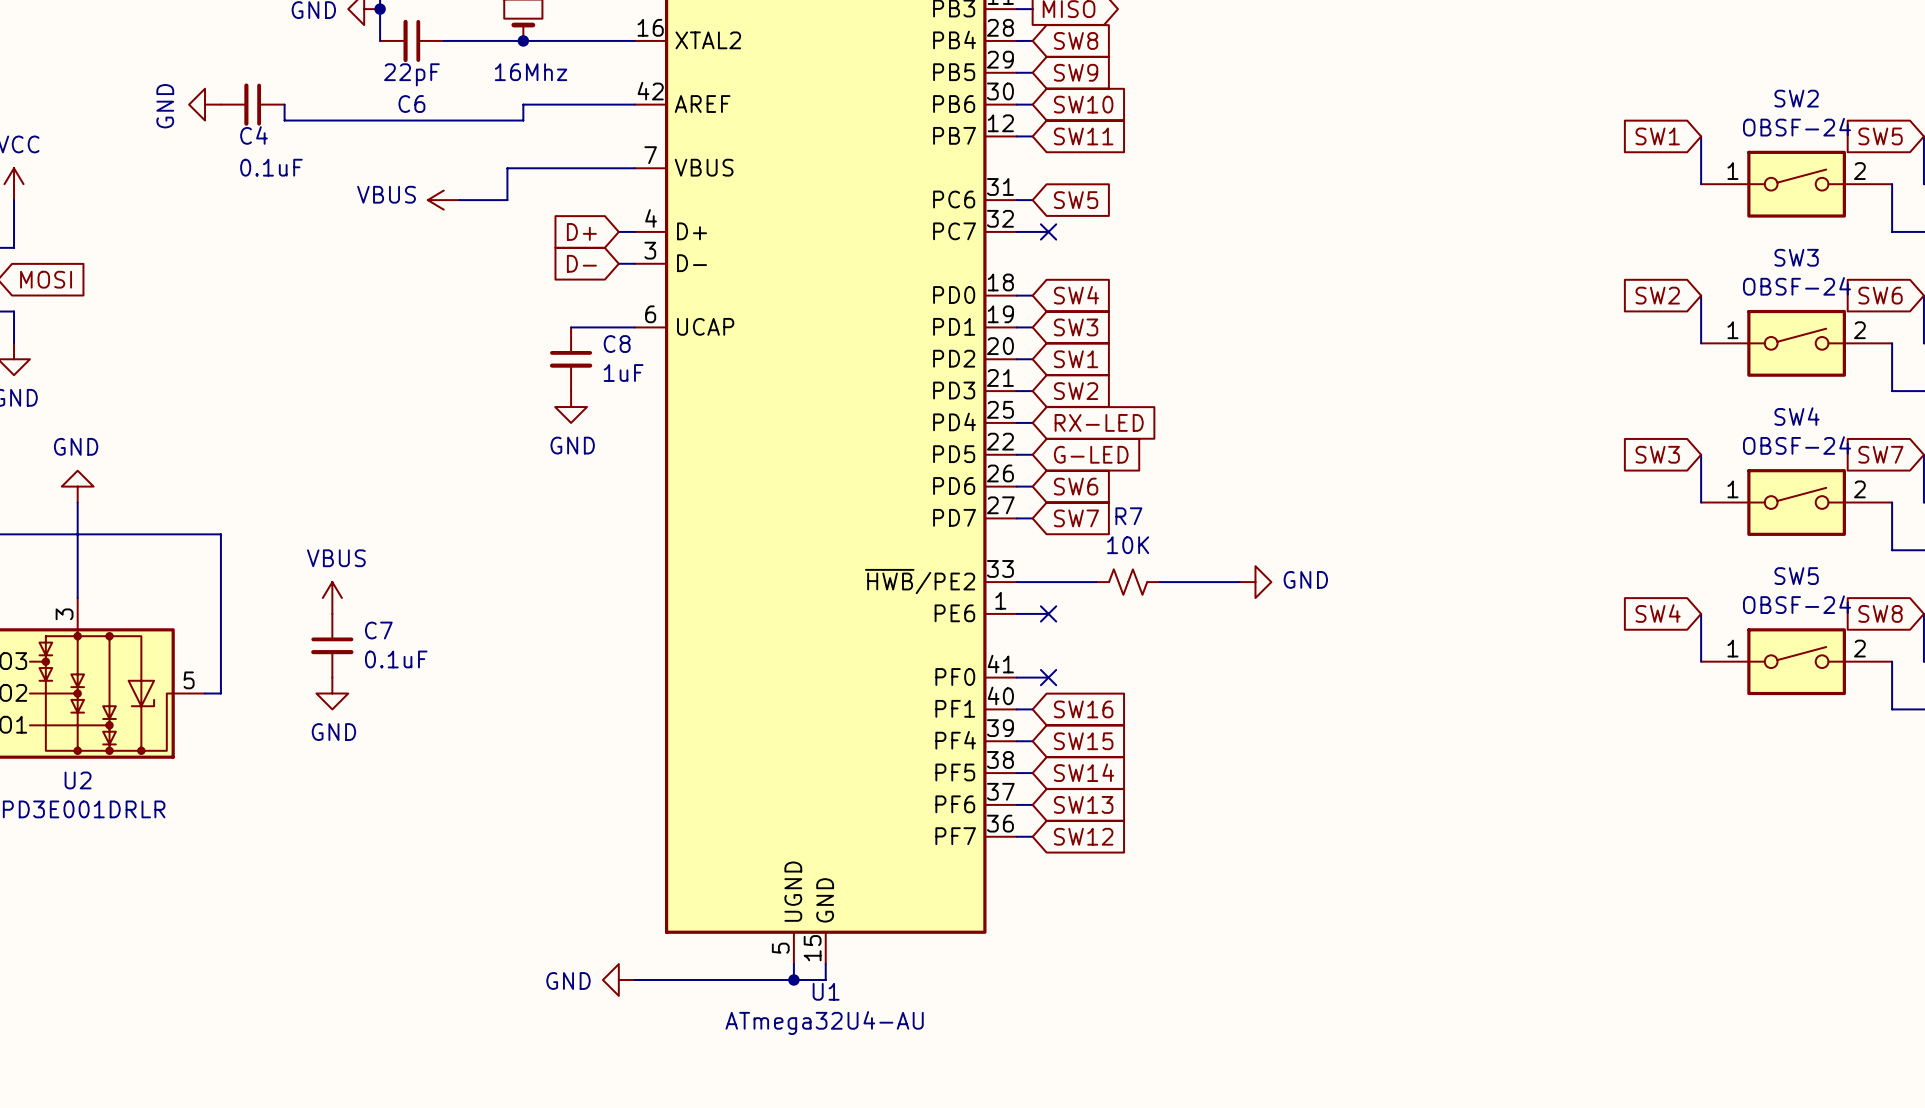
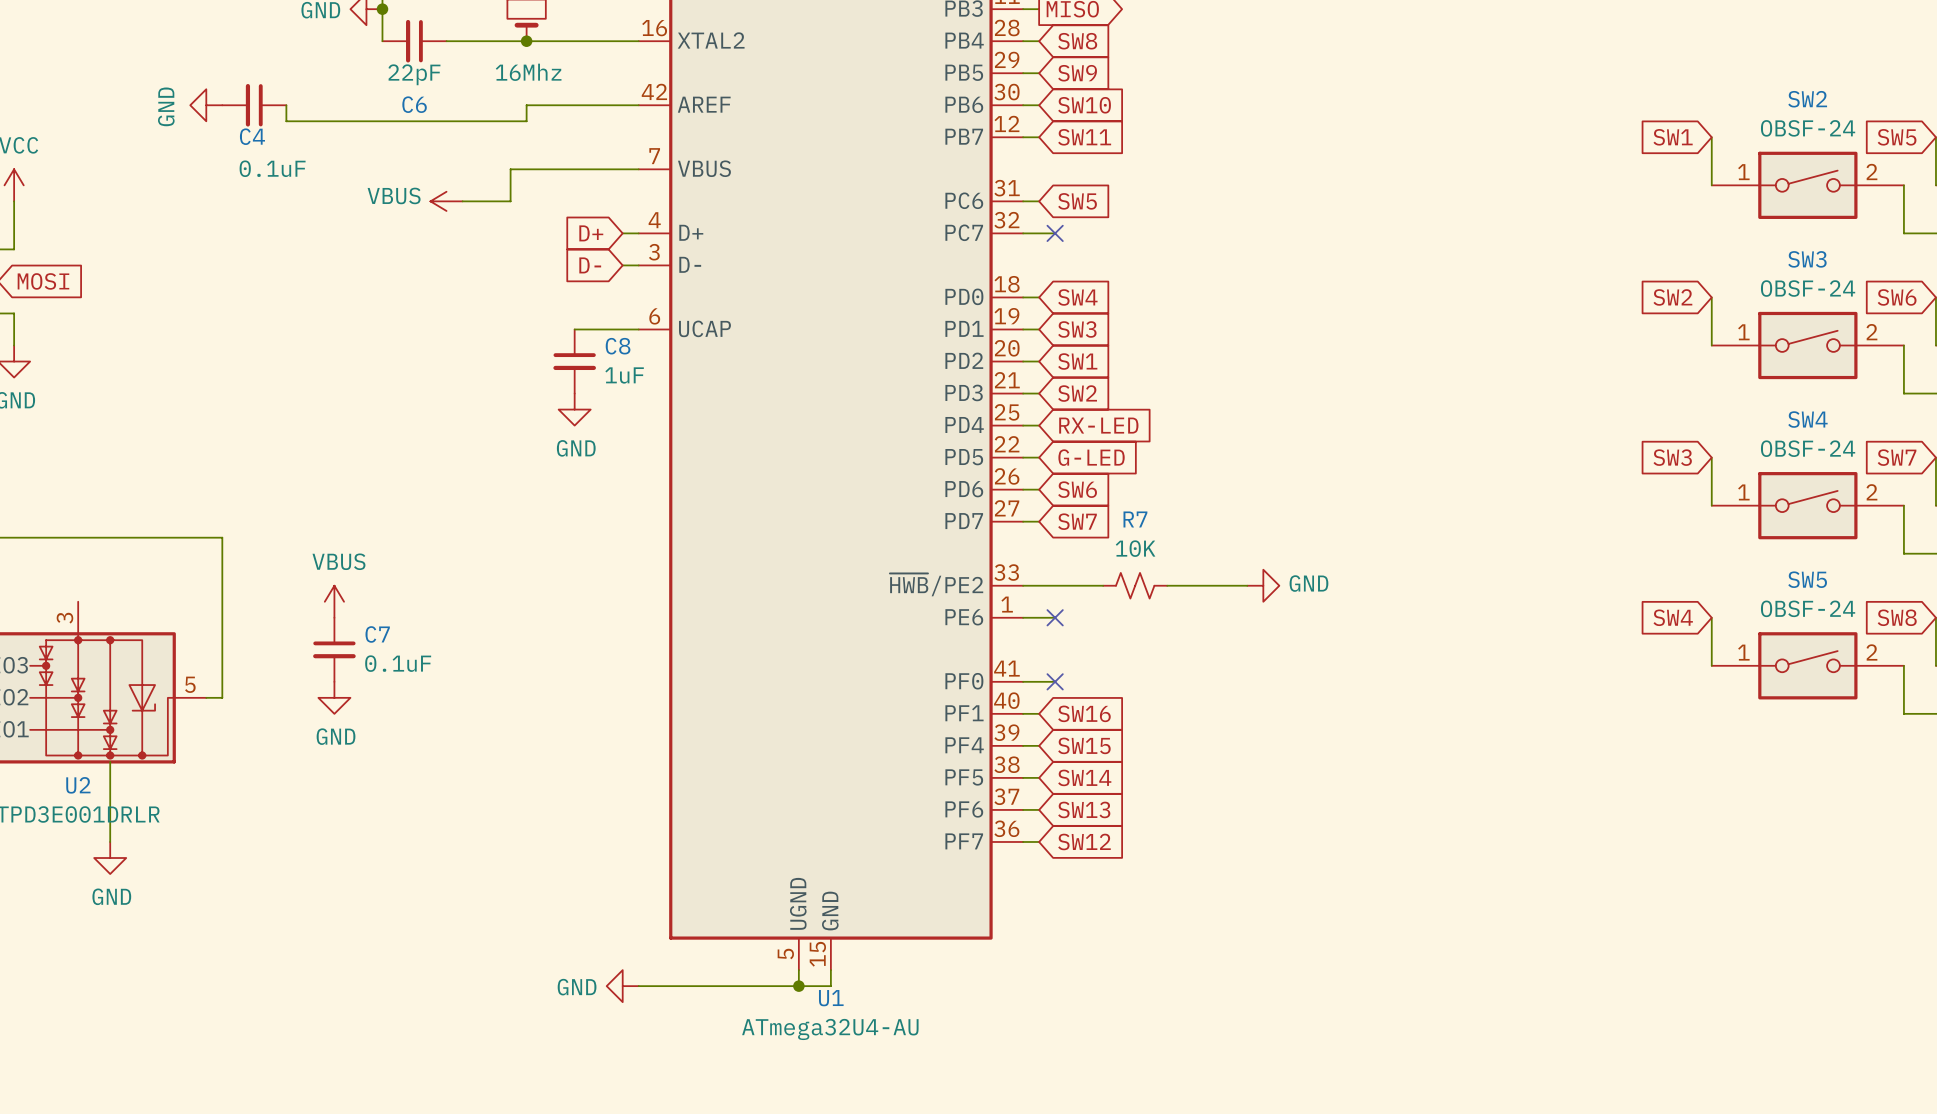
power symbol: GND (77, 486) -> none
wire: (77, 502) (77, 598) -> none
wire: none -> (110, 761) (110, 841)
power symbol: none -> GND (110, 858)

